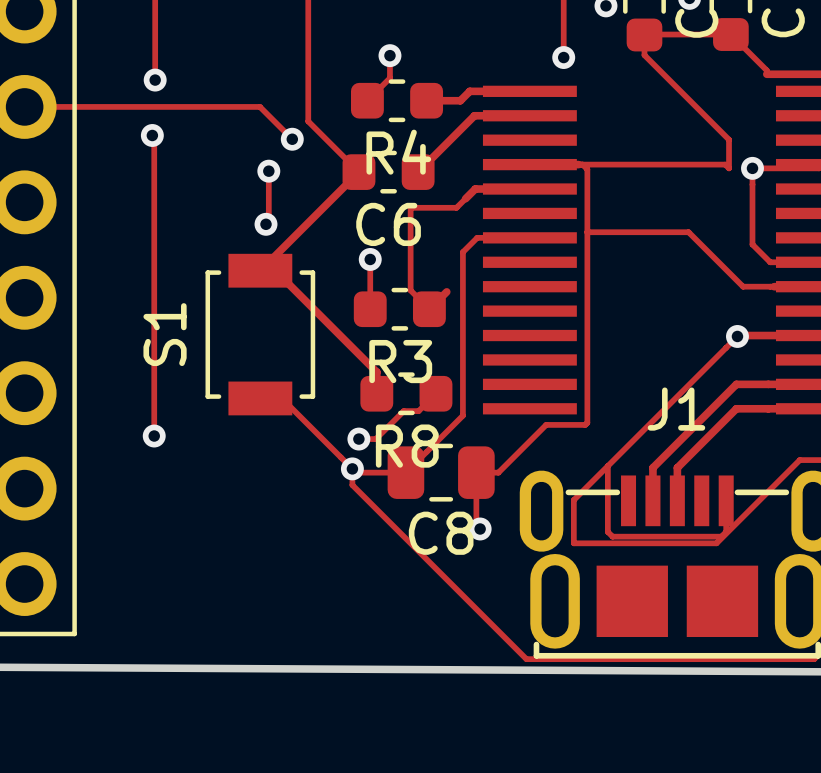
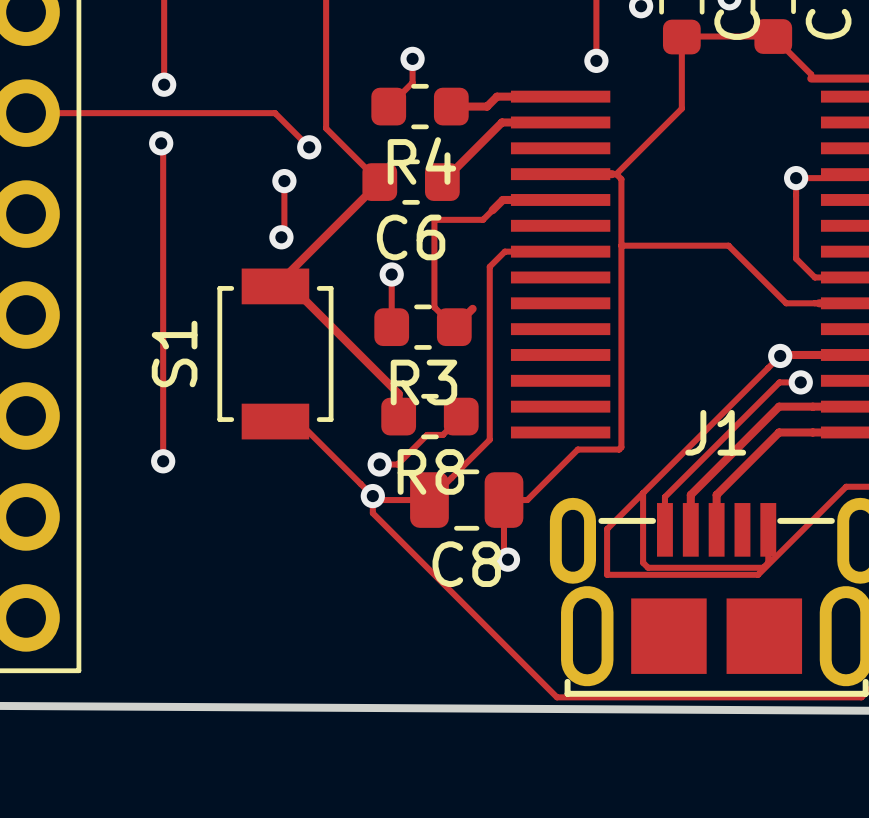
track: (644, 55) (729, 139) (729, 168) (725, 164) (582, 164) -> (681, 58) (681, 108) (616, 174)
track: none -> (800, 382) (779, 382) (664, 496) (664, 529)
via: none -> (800, 382)

